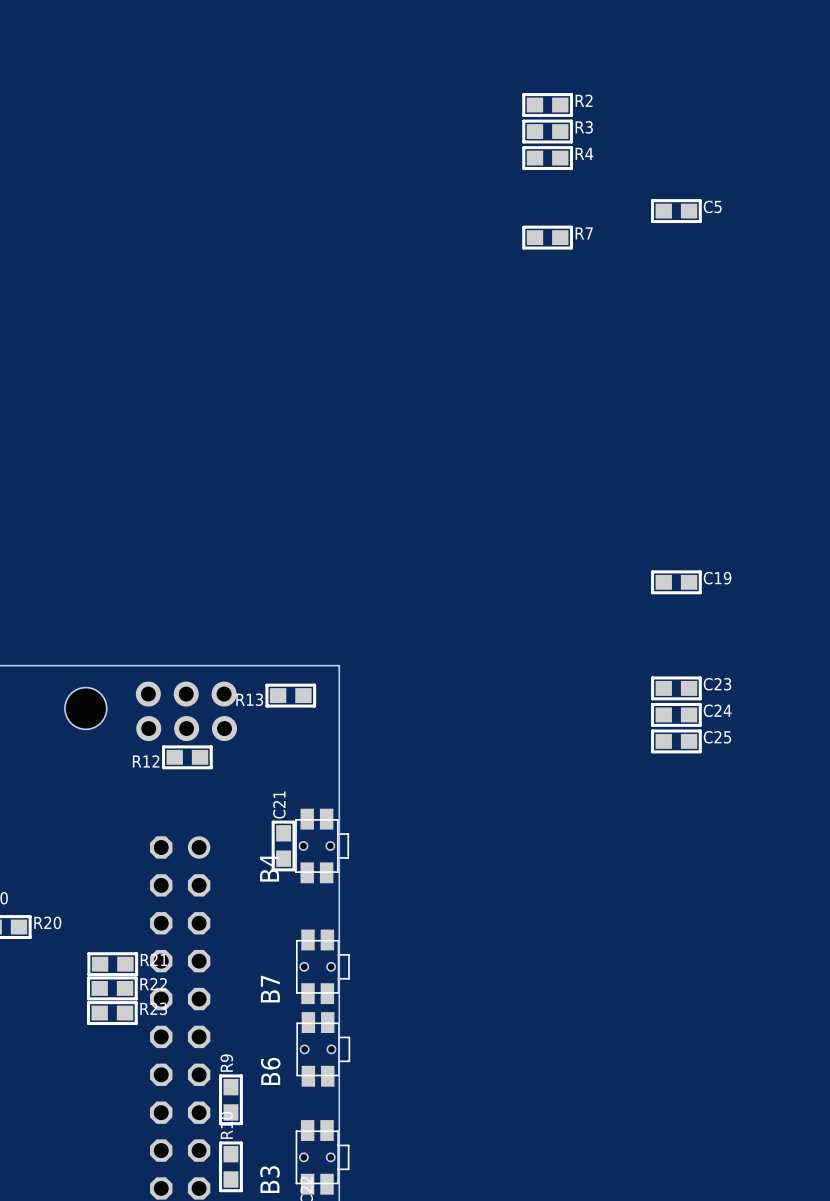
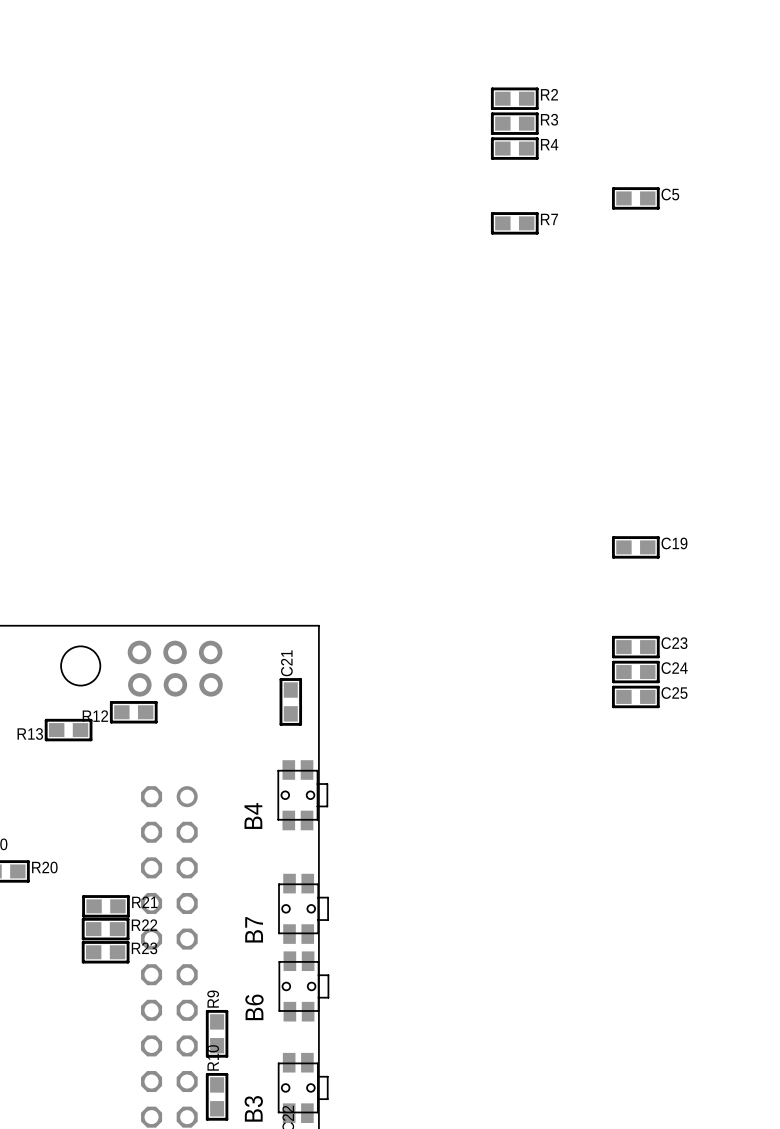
R13 position: (290, 695) -> (68, 730)
R12 position: (187, 757) -> (133, 712)
C21 position: (283, 845) -> (290, 701)

